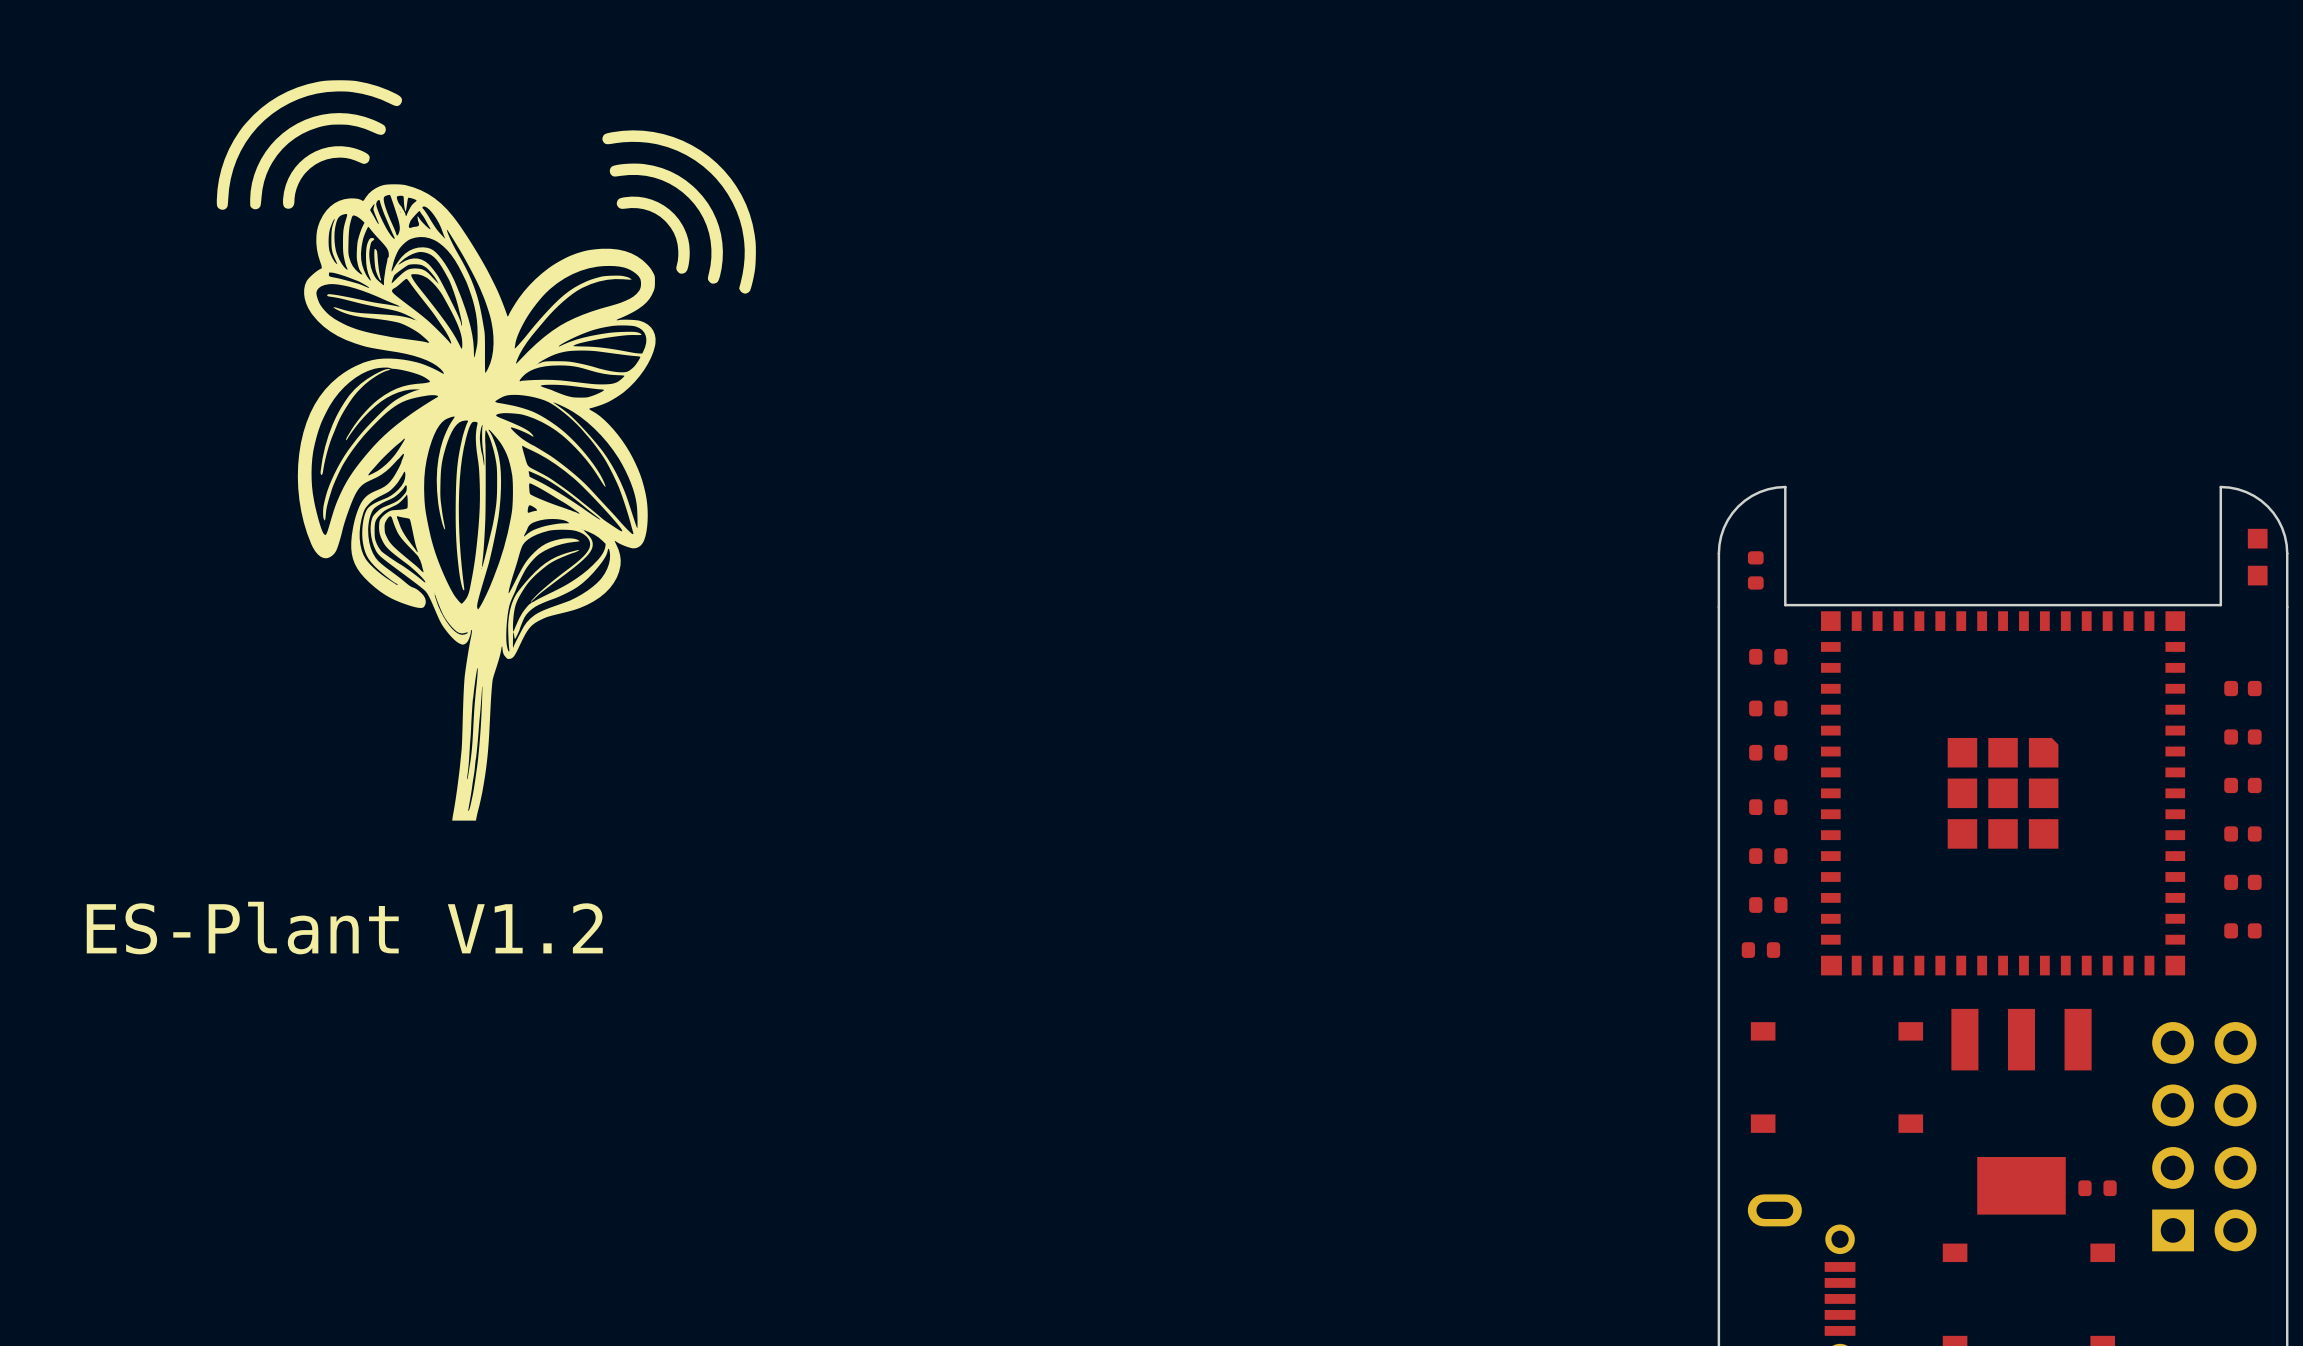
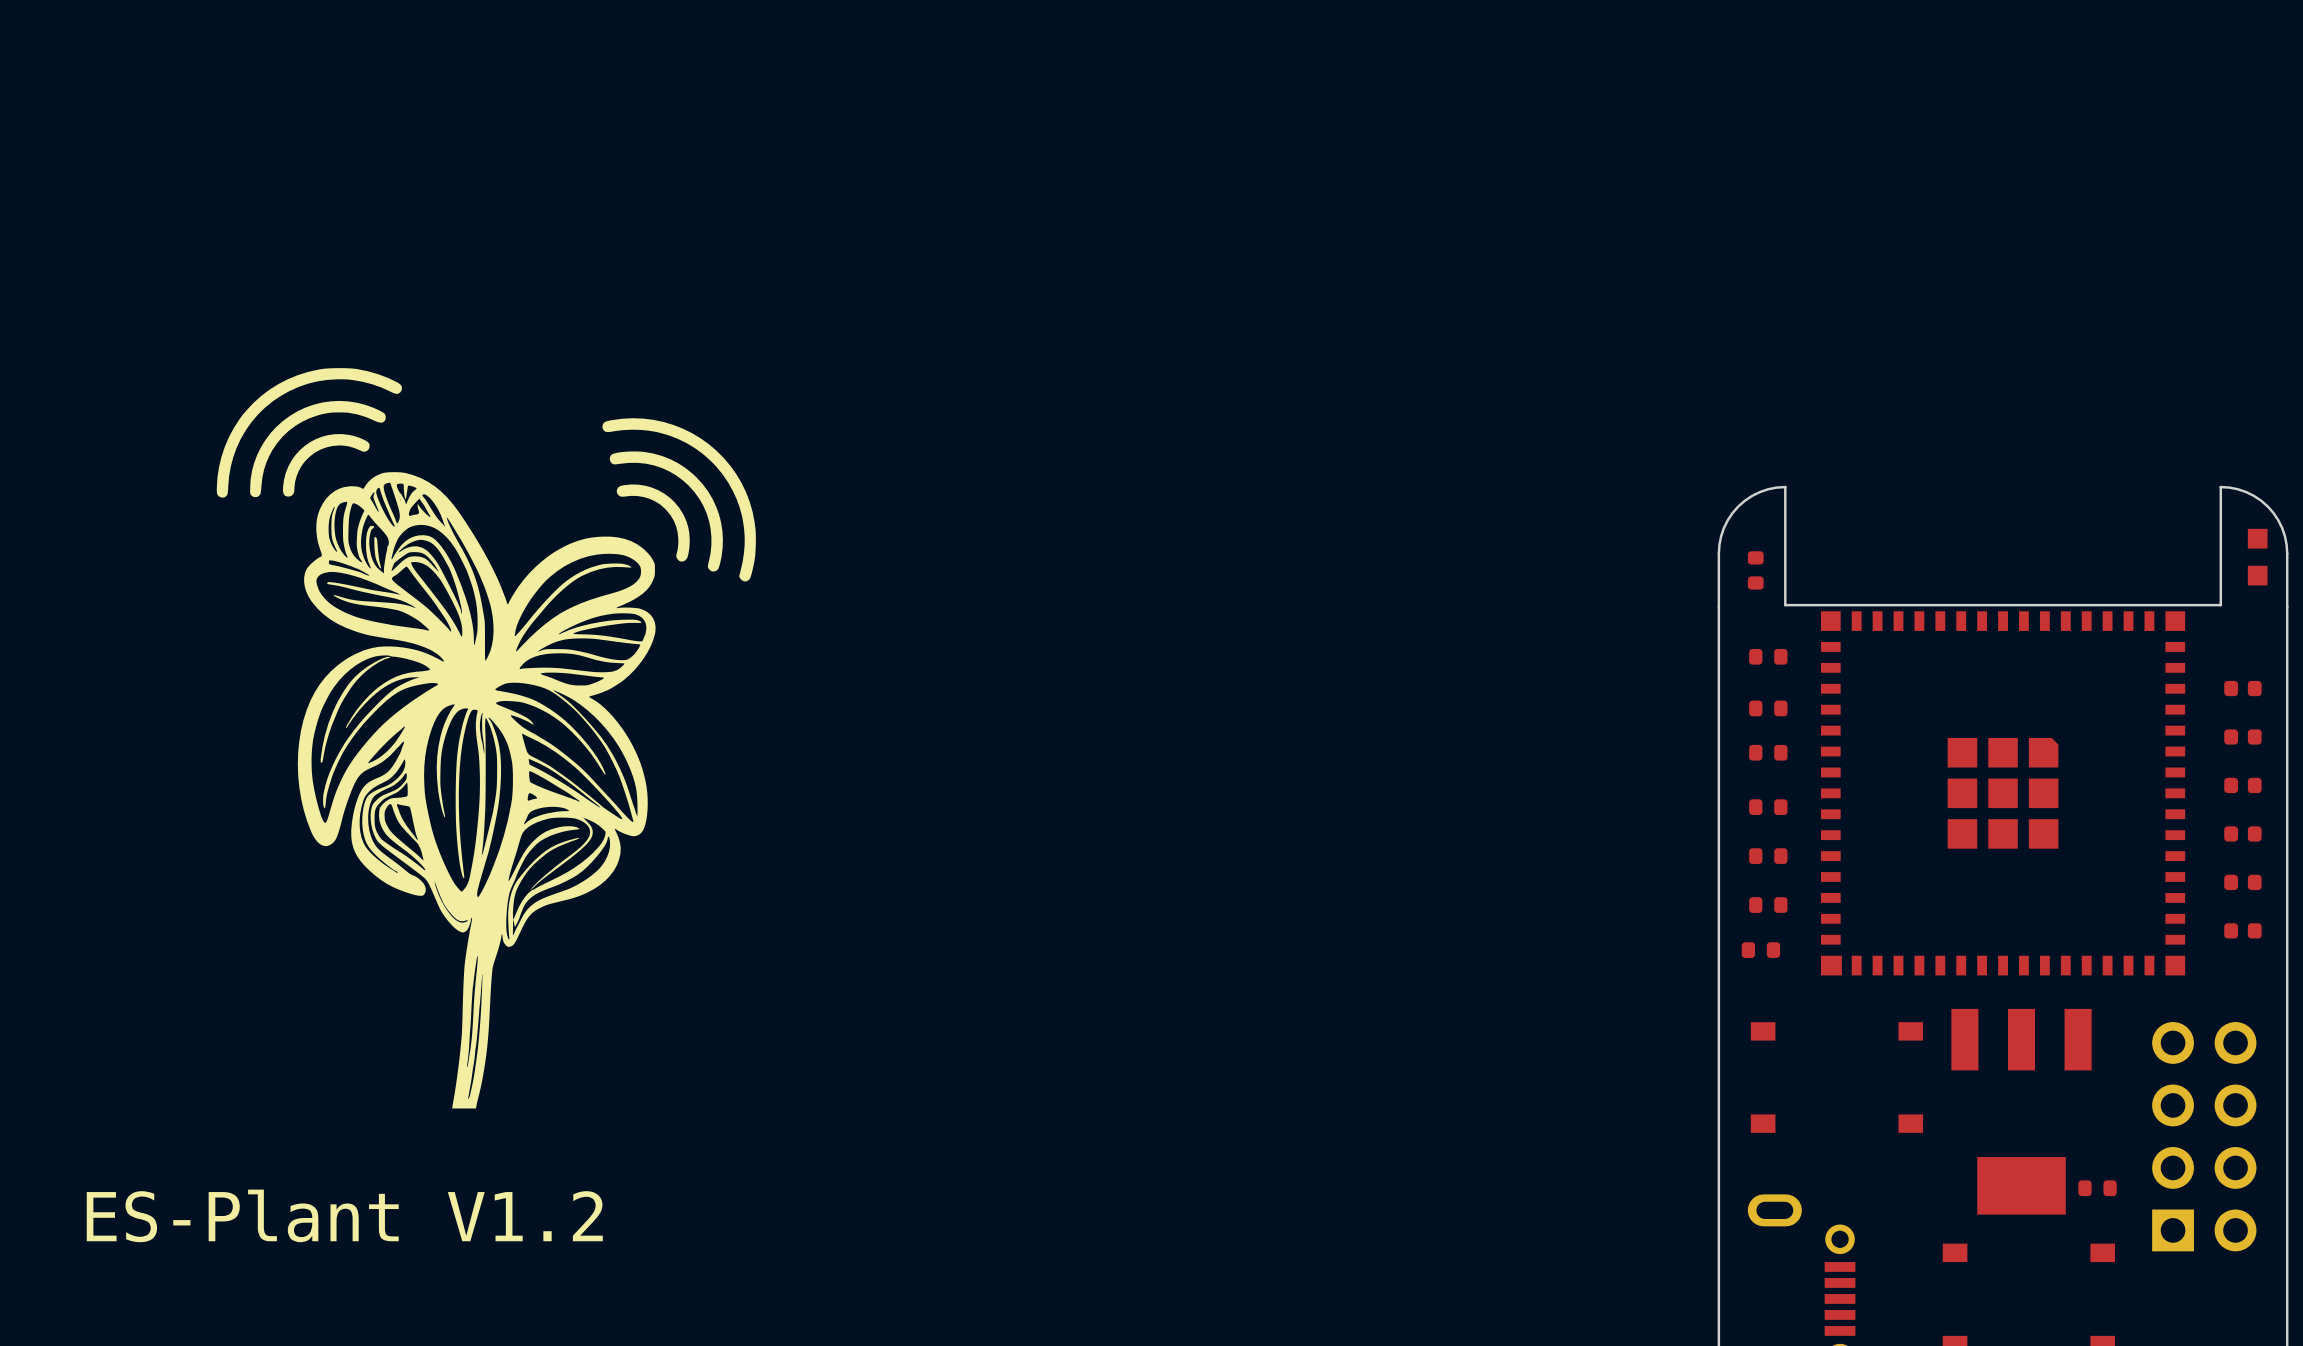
drawing position: (486, 450) -> (486, 738)
text position: ES-Plant V1.2 (344, 928) -> ES-Plant V1.2 (344, 1215)

